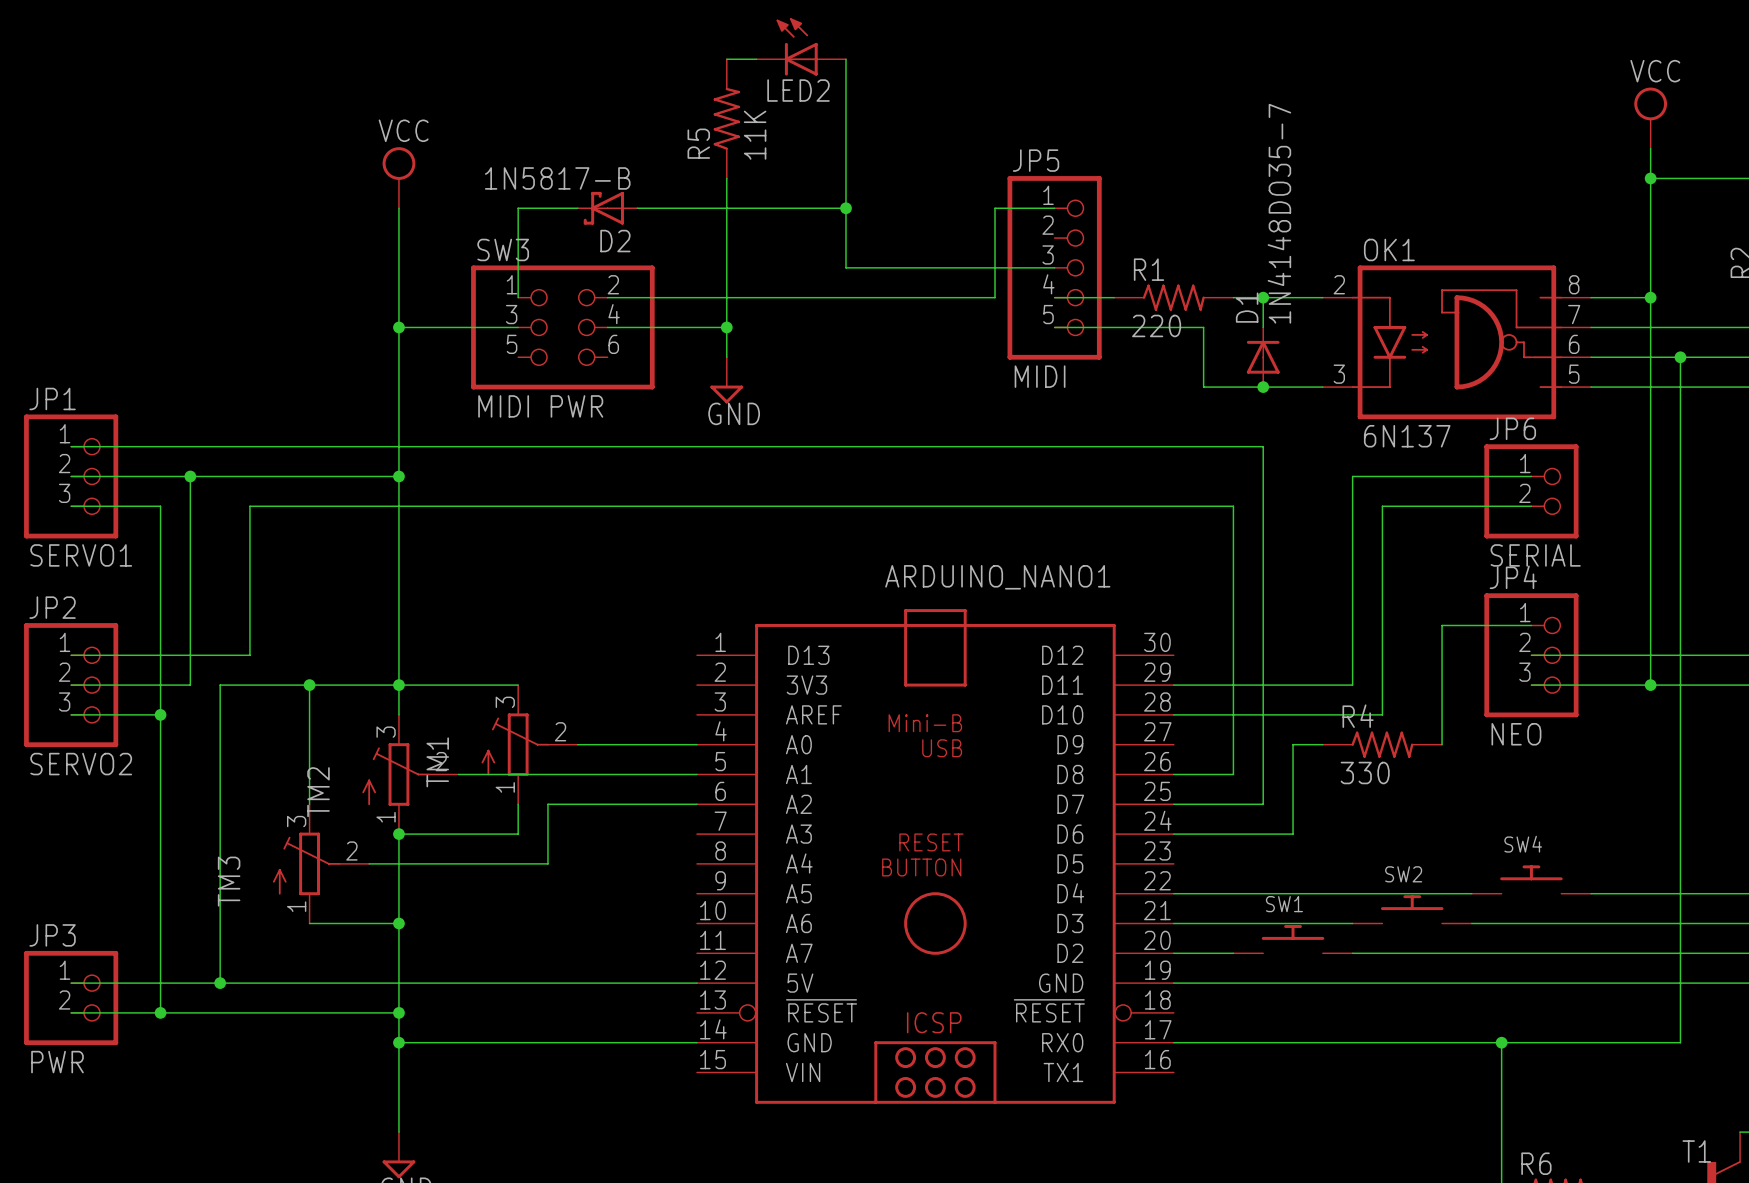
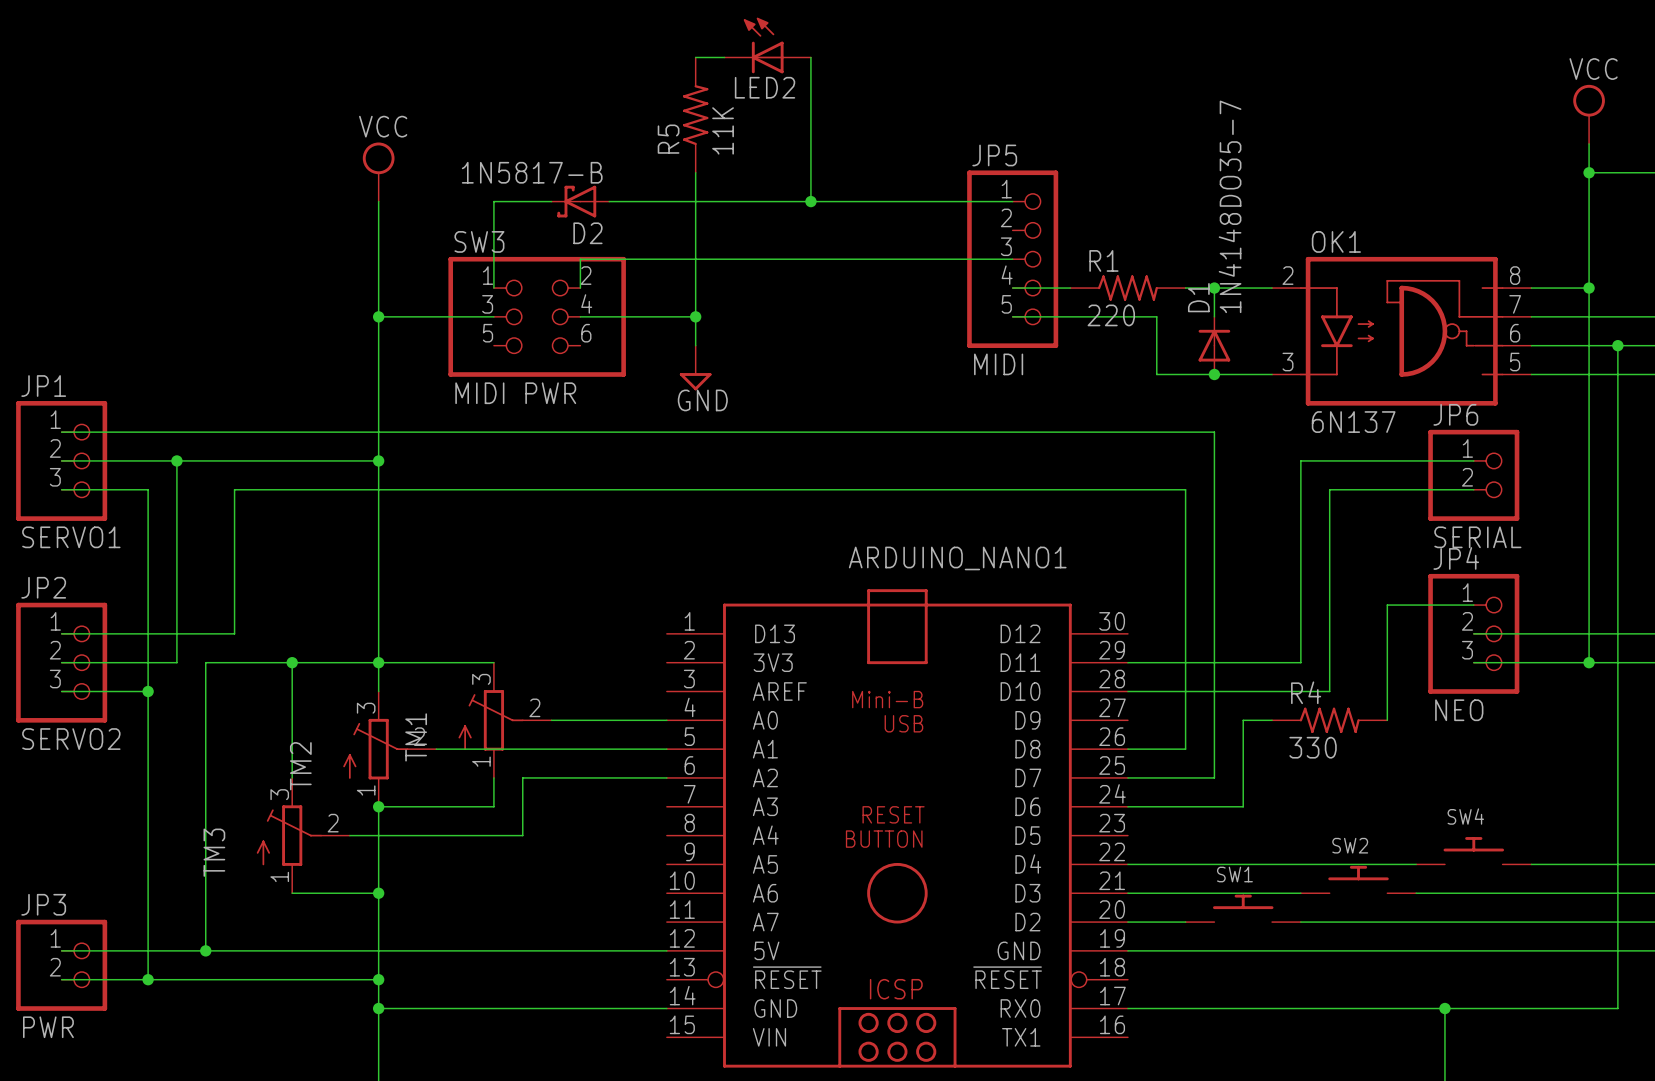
wire: (845, 208) (845, 267) -> (810, 201) (955, 201)
wire: (995, 208) (995, 297) (607, 297) -> (810, 259) (580, 259) (580, 288)

